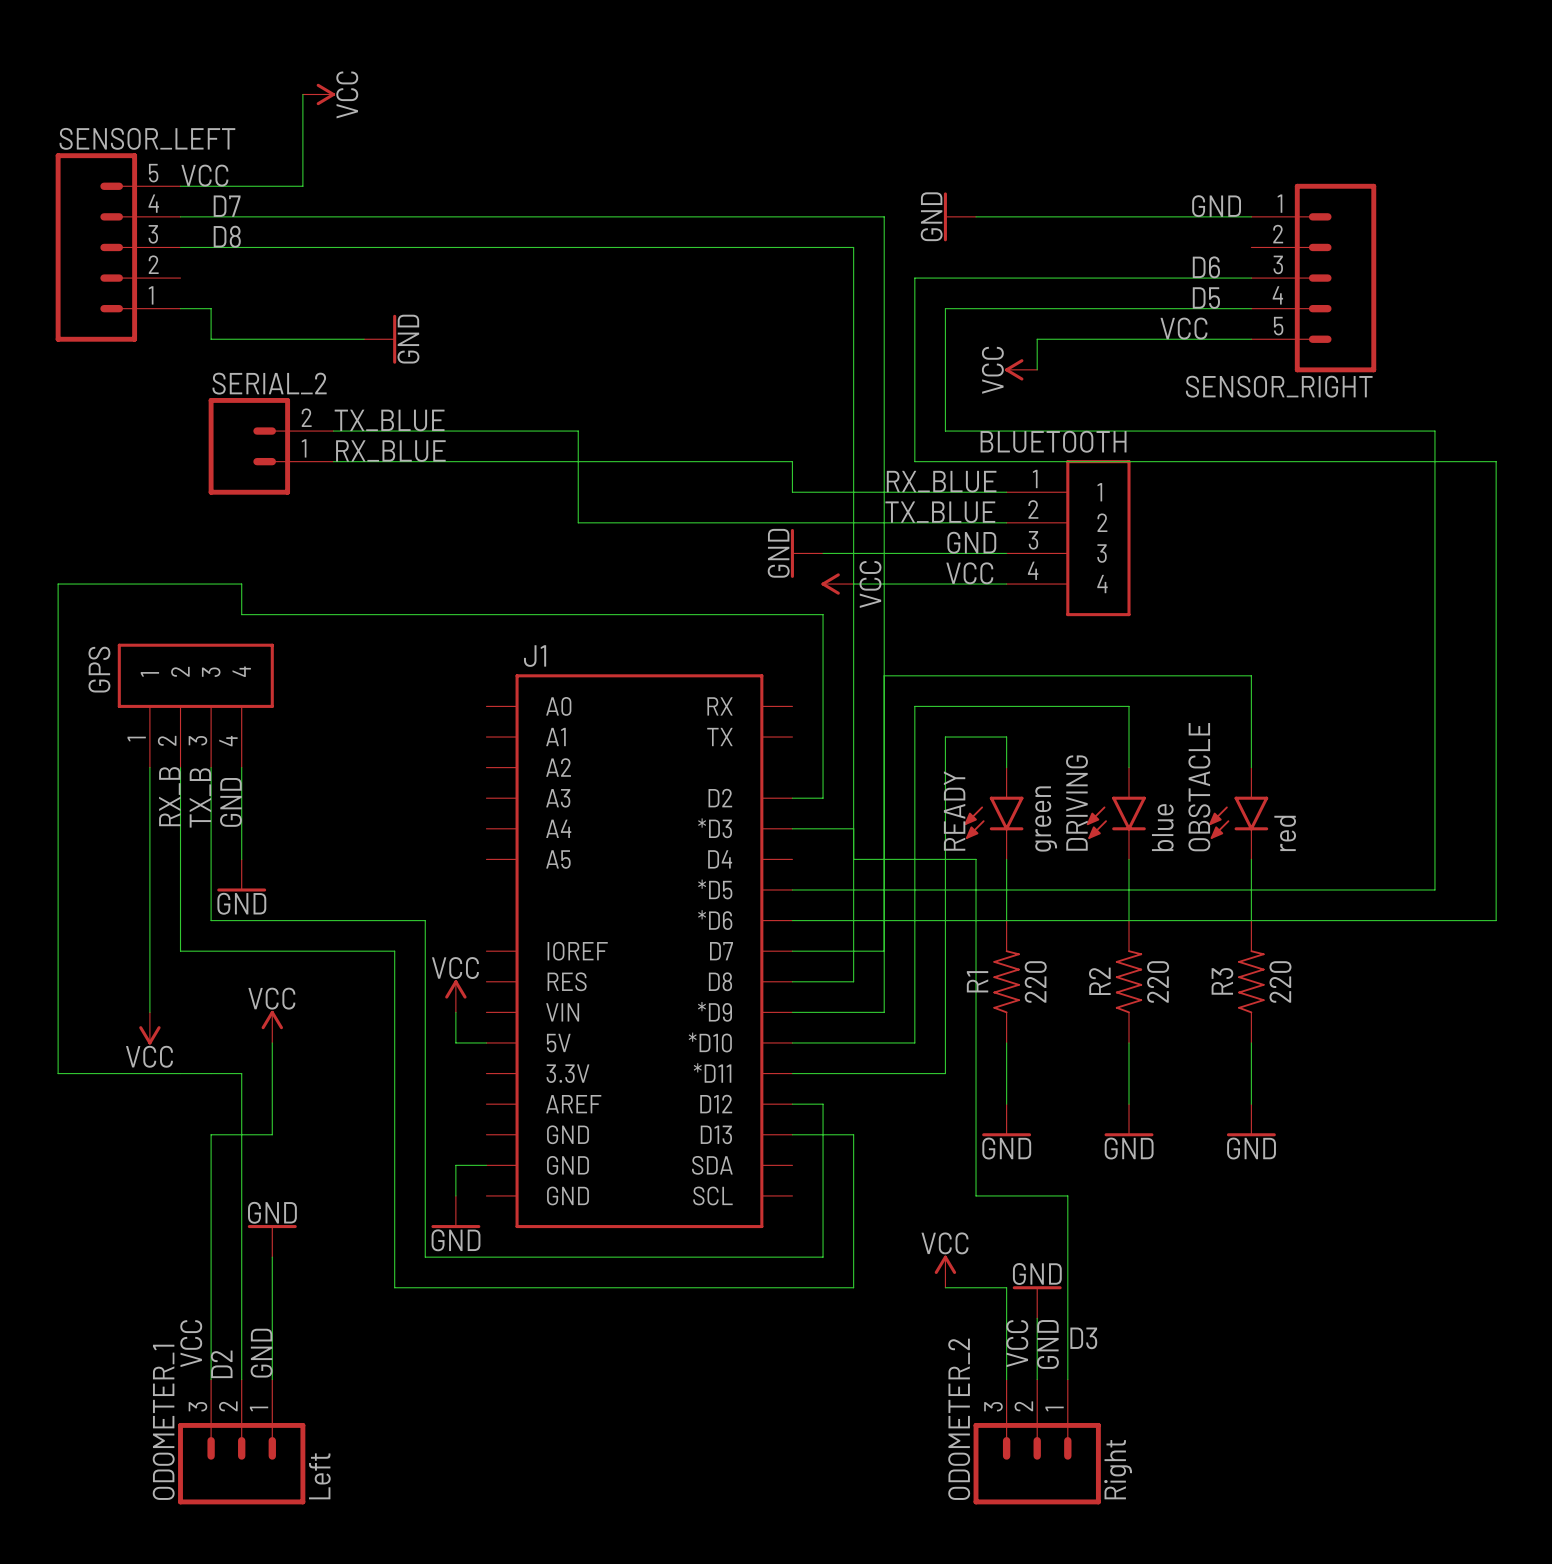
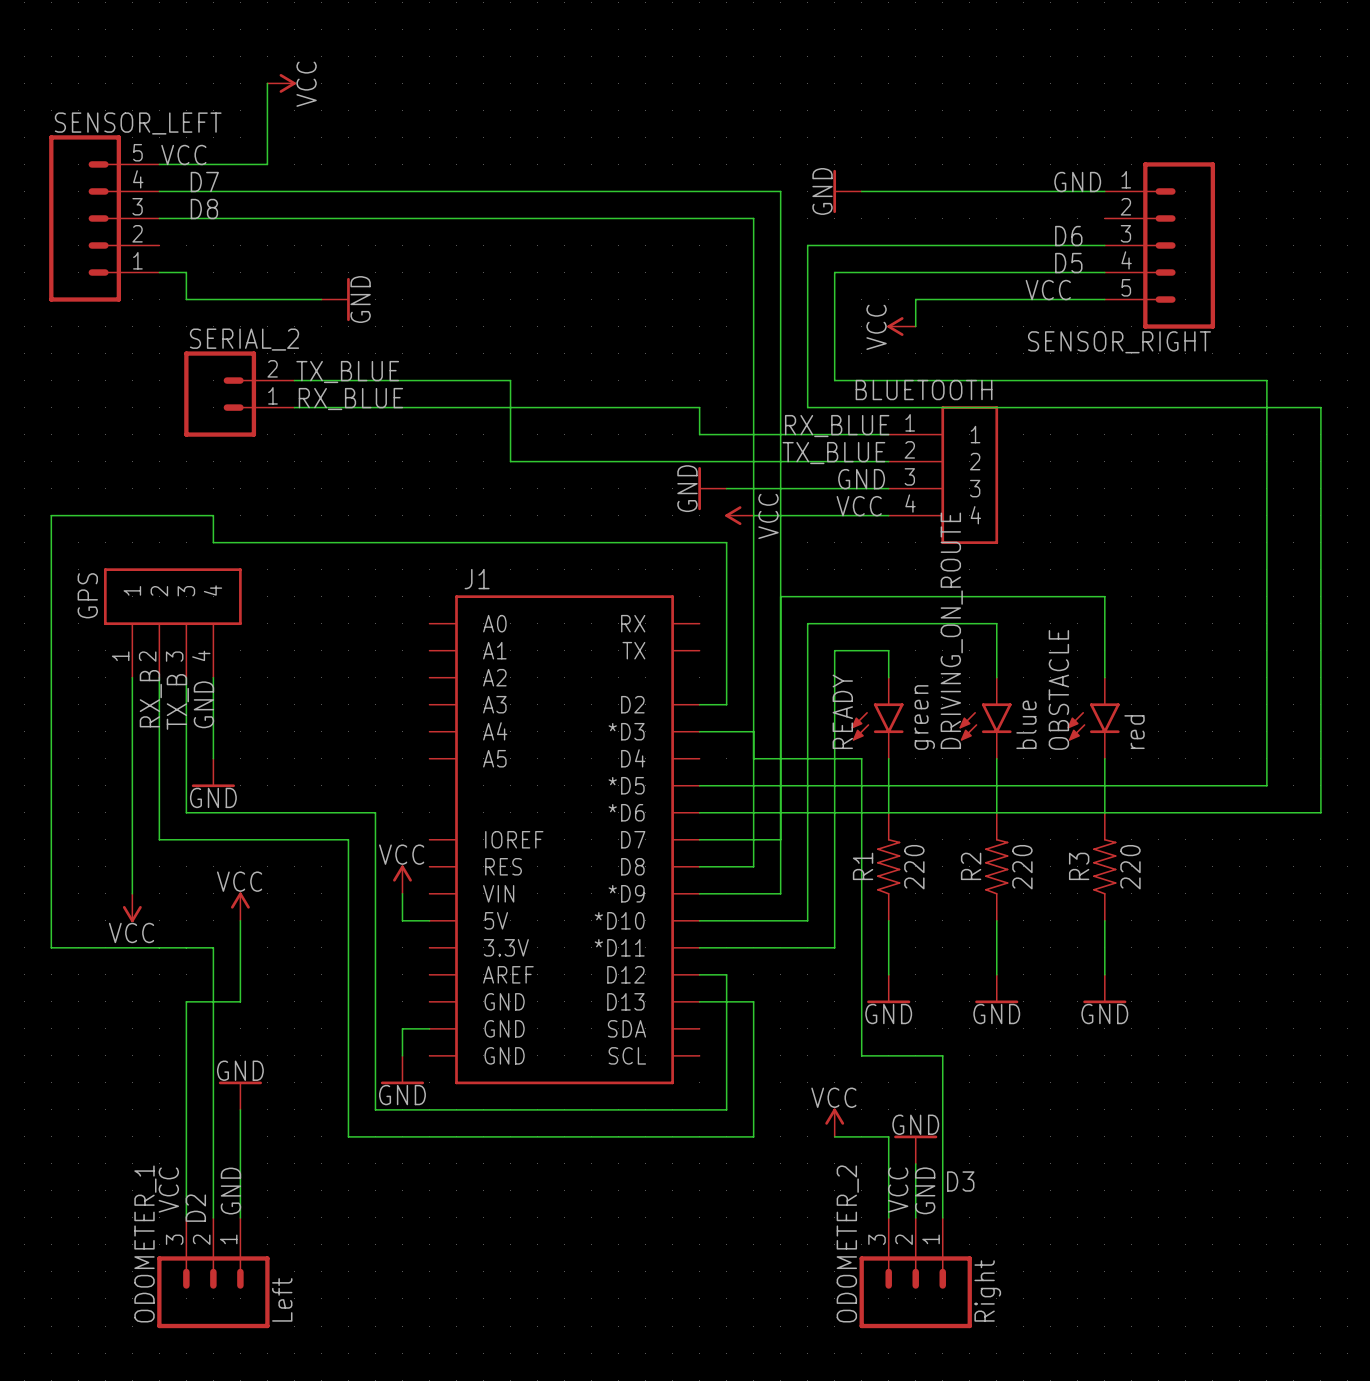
DRIVING name: DRIVING (1076, 803) -> DRIVING_ON_ROUTE (951, 630)

